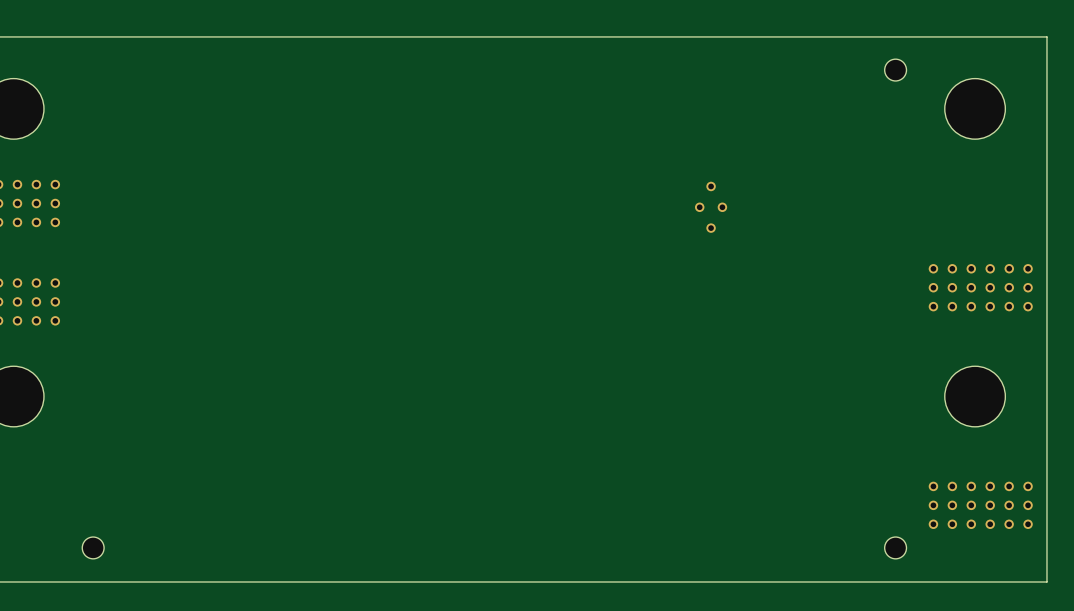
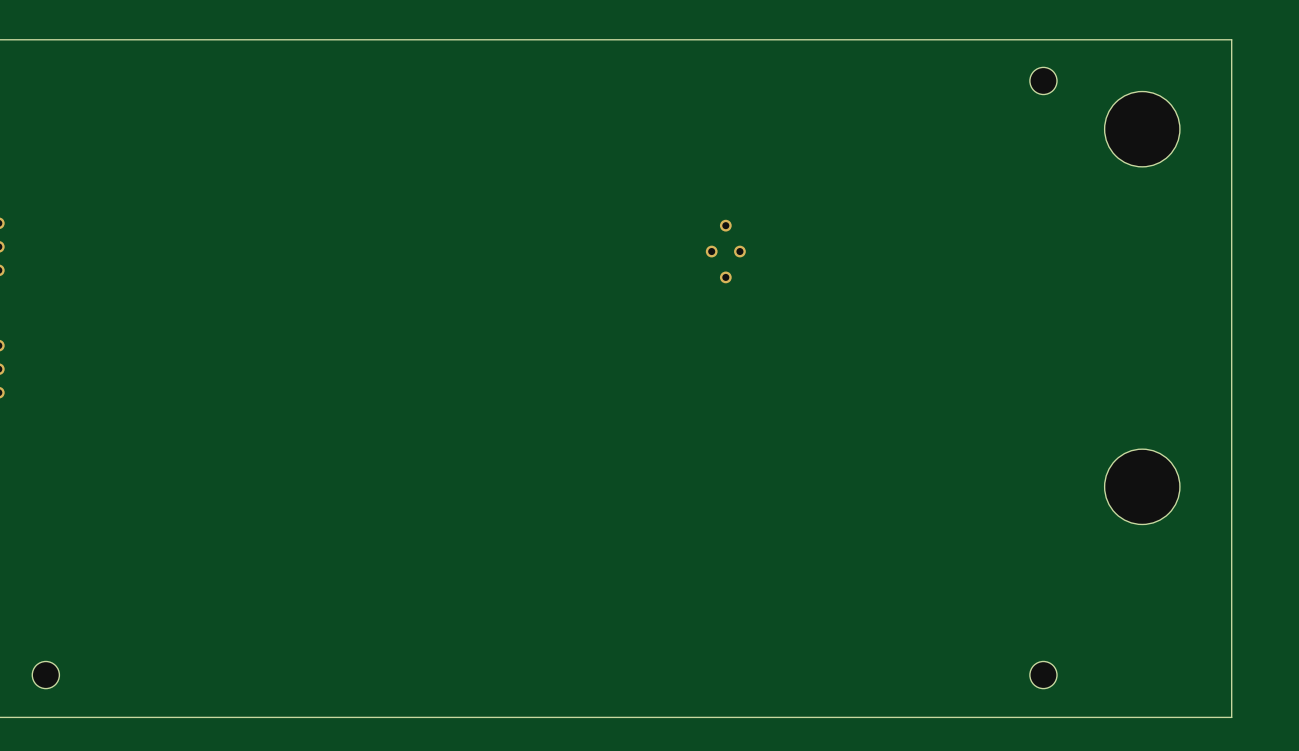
part position: (711, 207) -> (725, 251)
part: (980, 287) -> none
part: (980, 505) -> none

